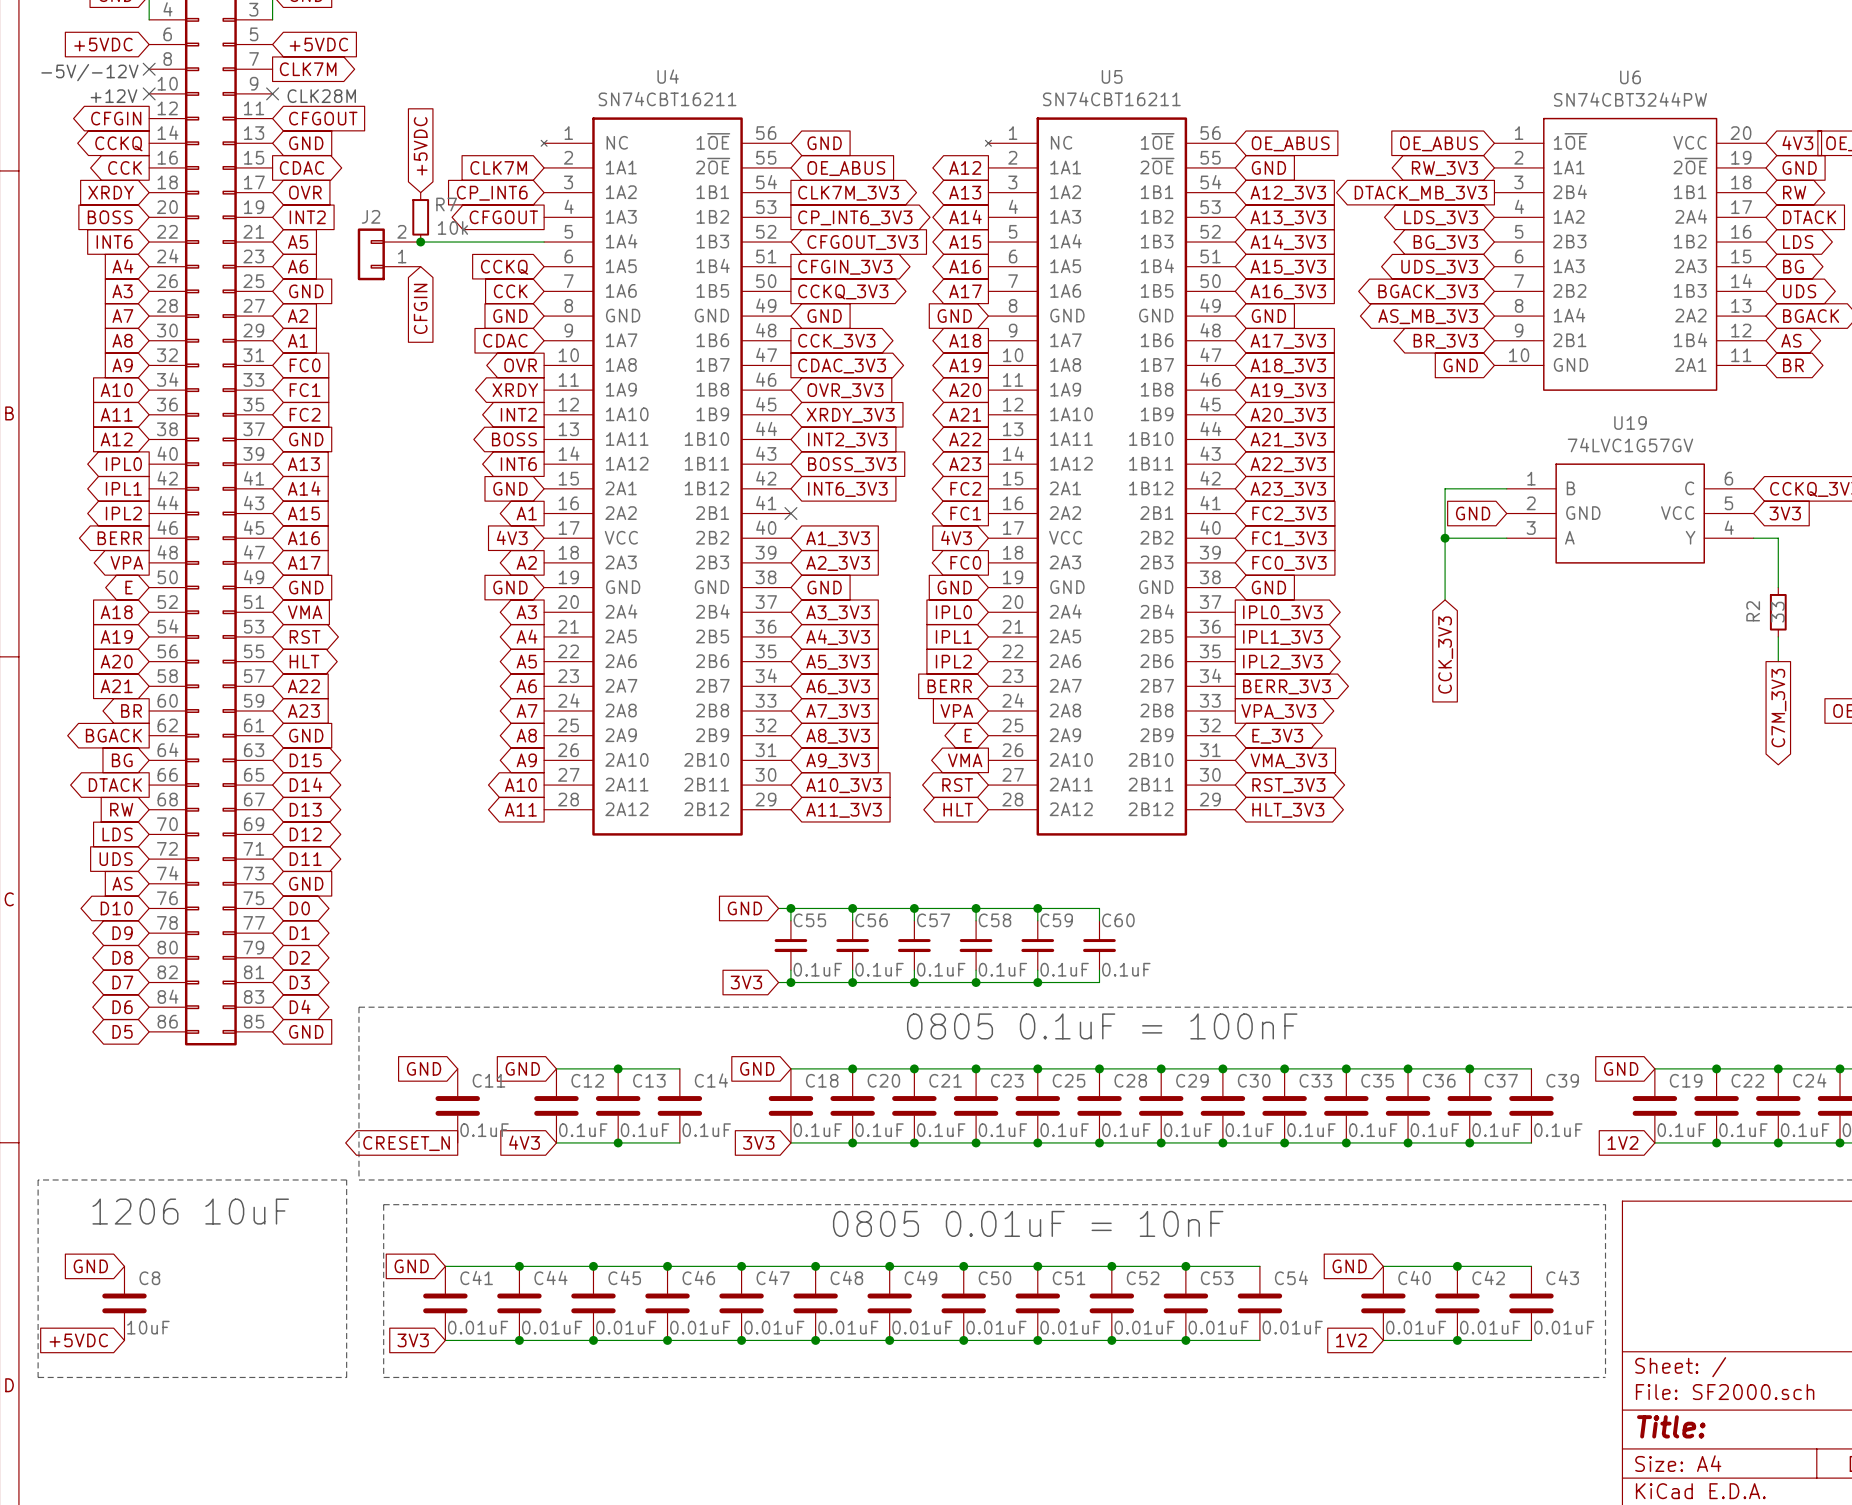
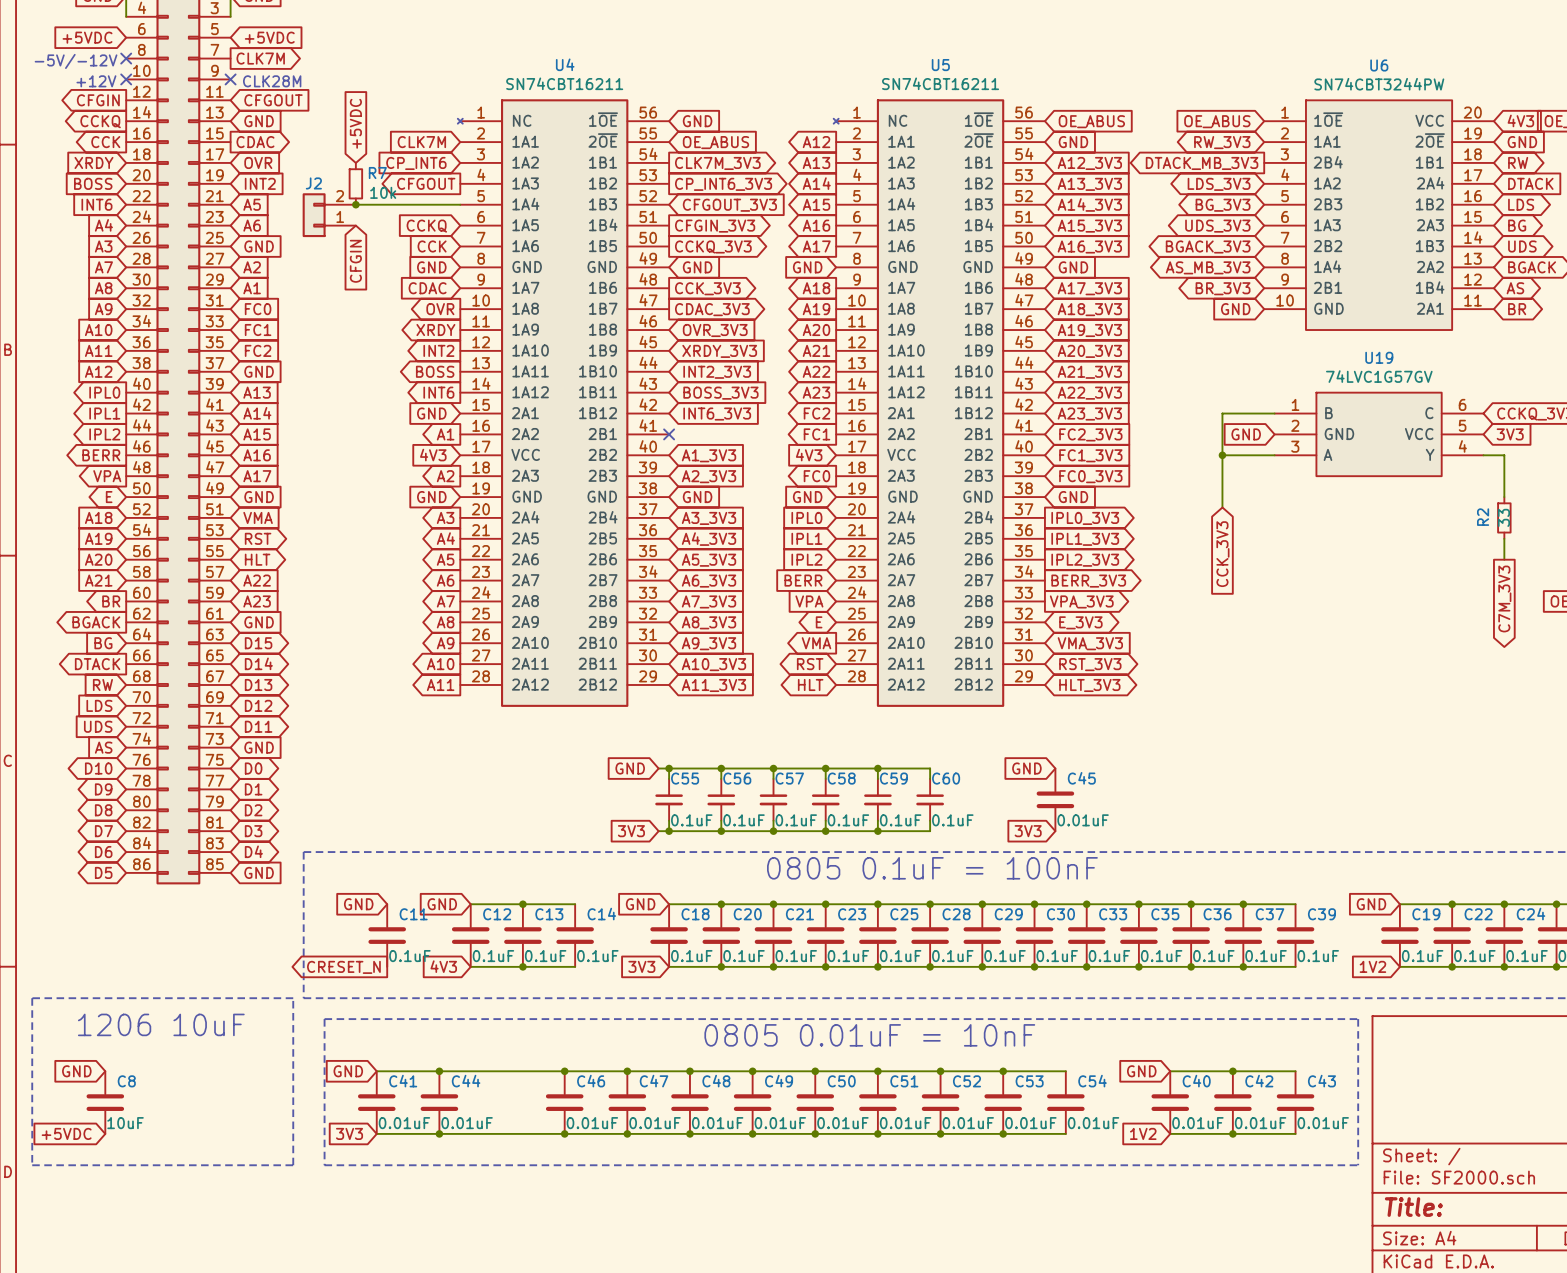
global label: none -> GND (1026, 768)
global label: none -> 3V3 (1028, 831)
junction: (593, 1266) -> none
C45 position: (593, 1303) -> (1055, 799)
junction: (593, 1340) -> none

